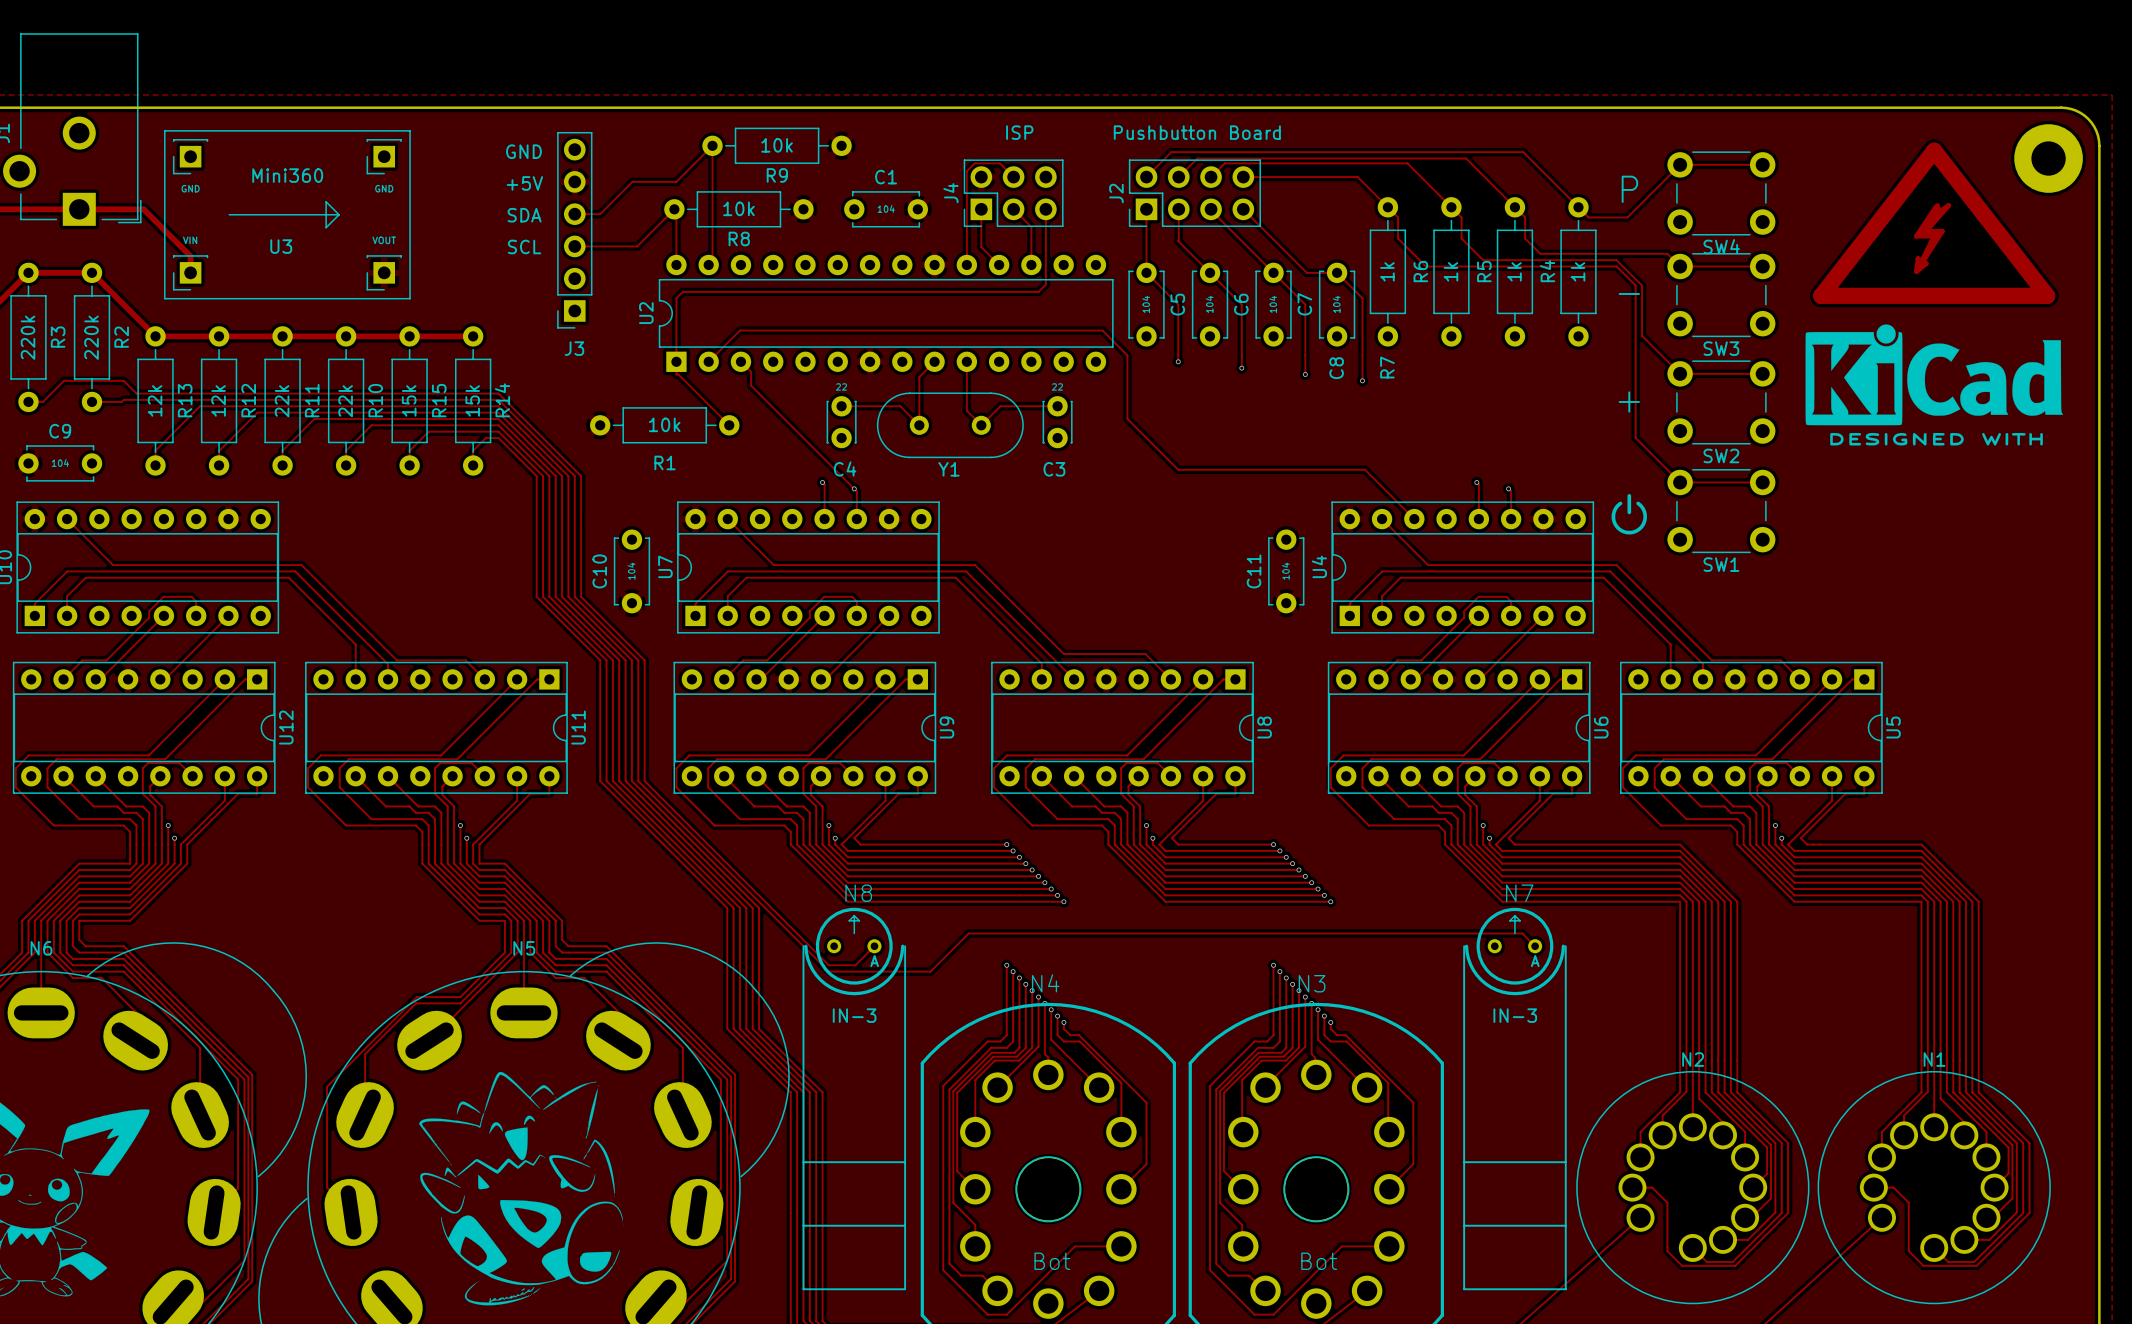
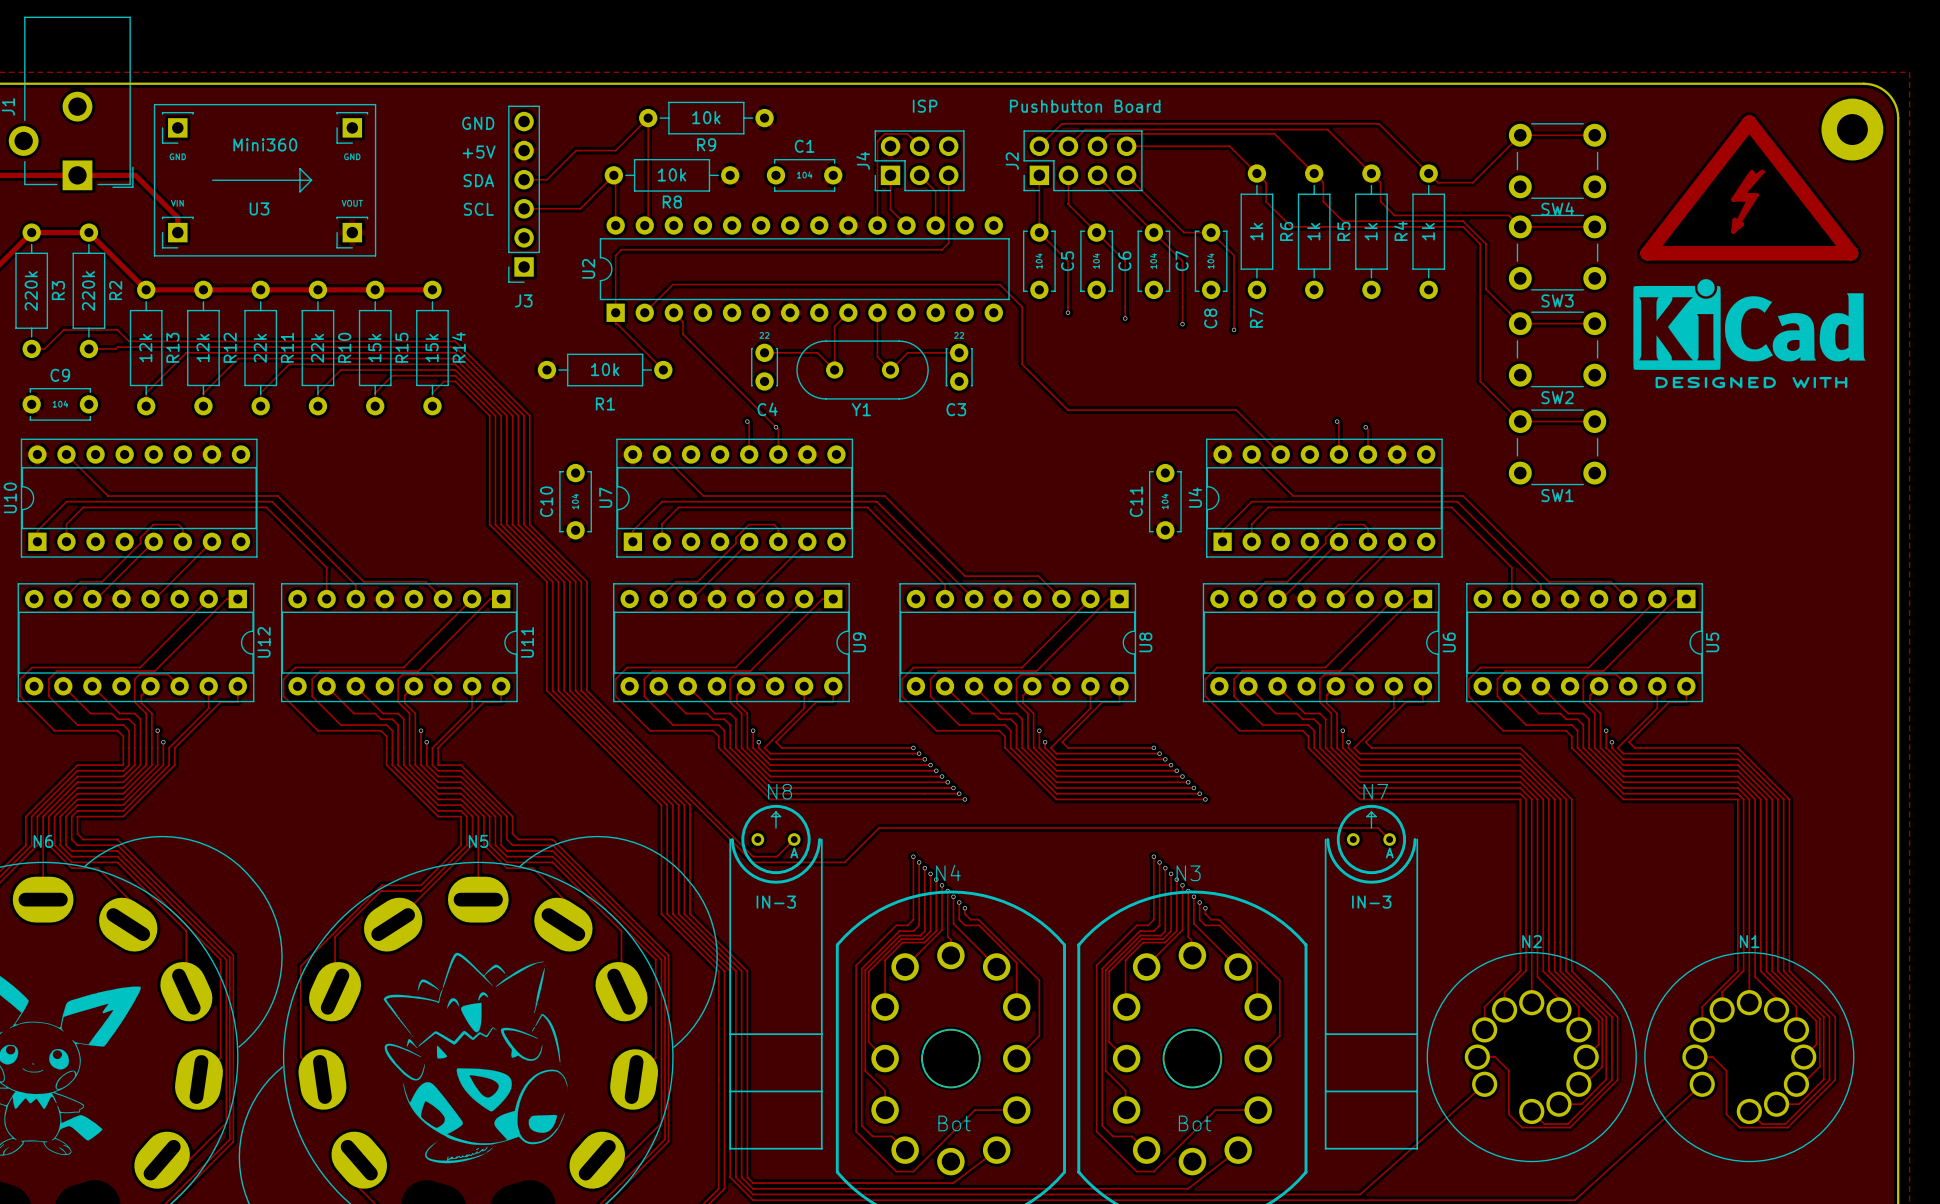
text: P (1629, 189) -> none
text: - (1629, 293) -> none
text: + (1629, 401) -> none
drawing: [1611, 494, 1648, 535] -> none

